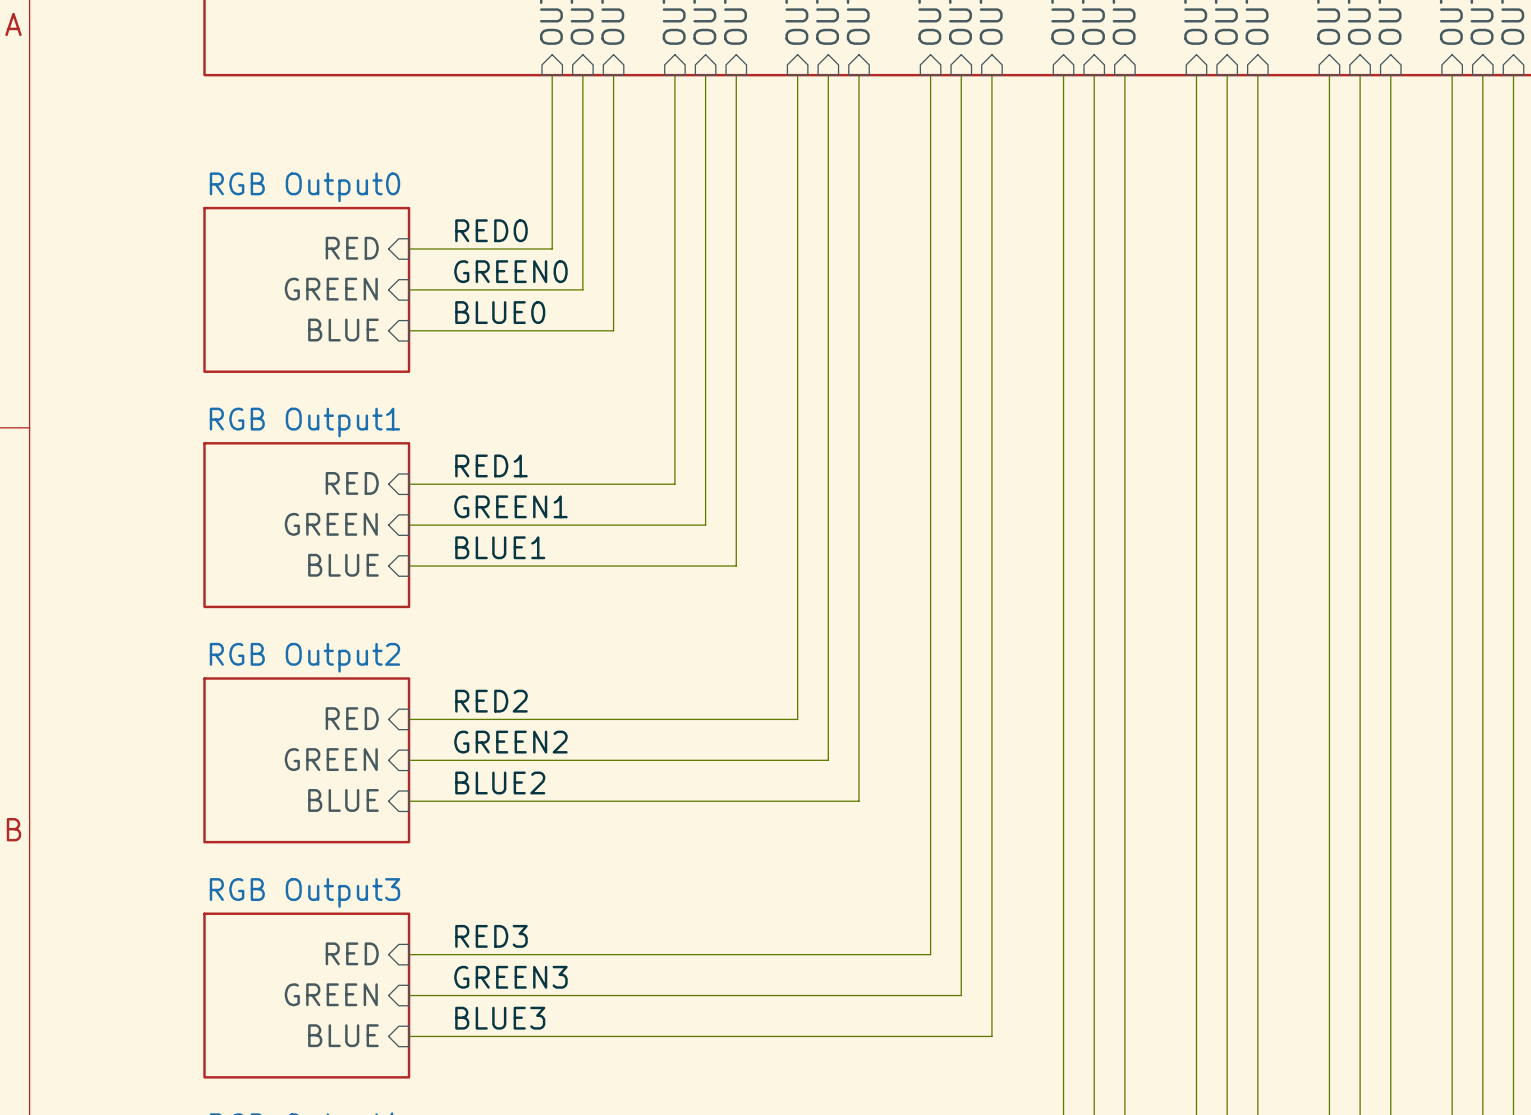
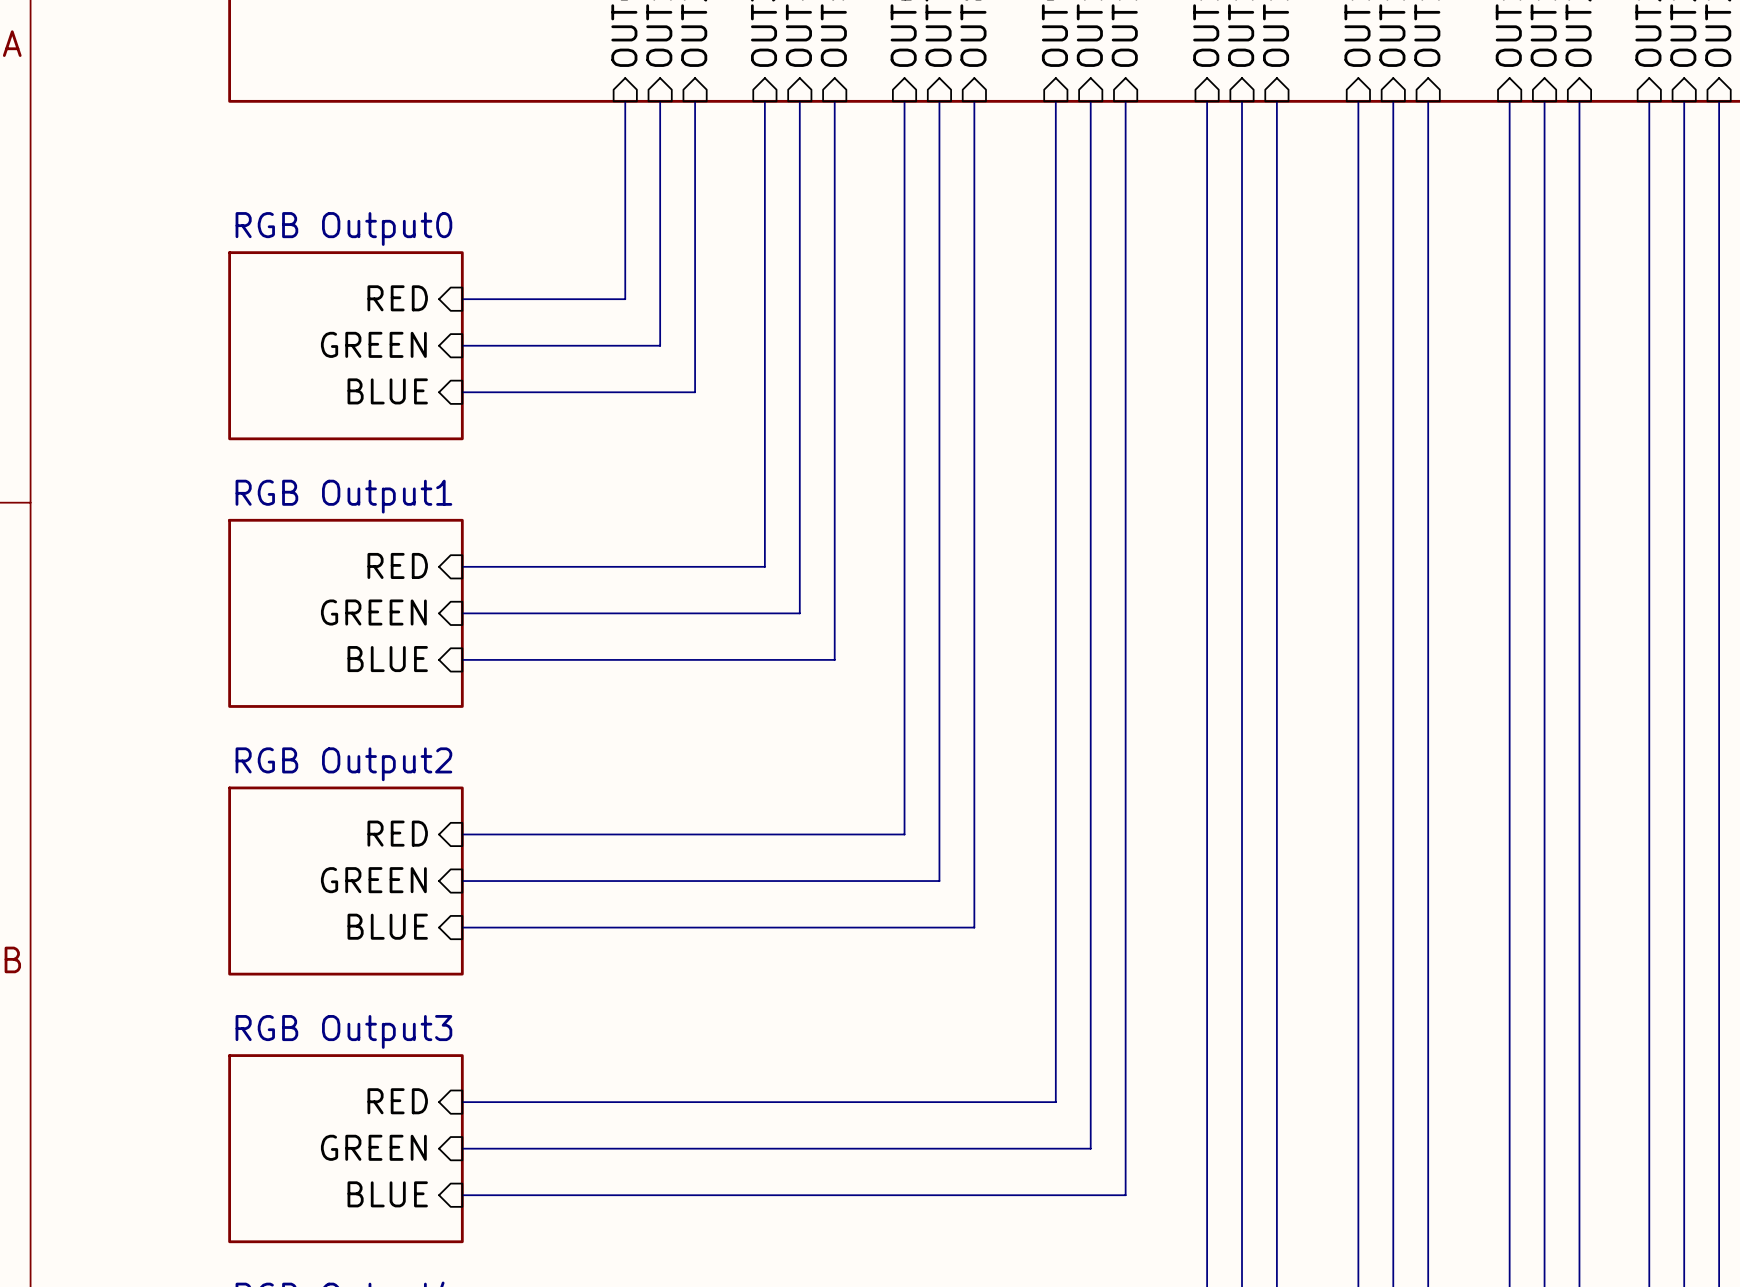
label: RED0 (491, 230) -> none
label: GREEN0 (510, 271) -> none
label: BLUE0 (500, 312) -> none
label: RED1 (491, 465) -> none
label: GREEN1 (510, 506) -> none
label: BLUE1 (500, 547) -> none
label: RED2 (491, 701) -> none
label: GREEN2 (510, 742) -> none
label: BLUE2 (500, 782) -> none
label: RED3 (491, 936) -> none
label: GREEN3 (510, 977) -> none
label: BLUE3 (500, 1018) -> none

